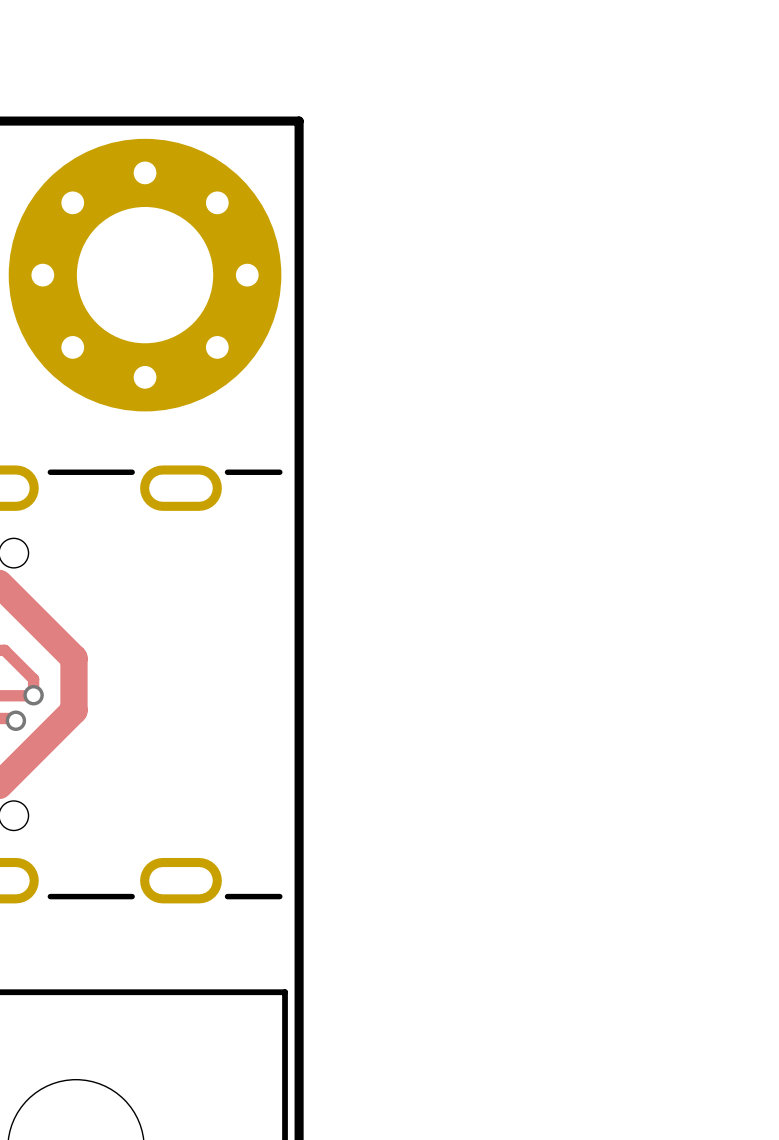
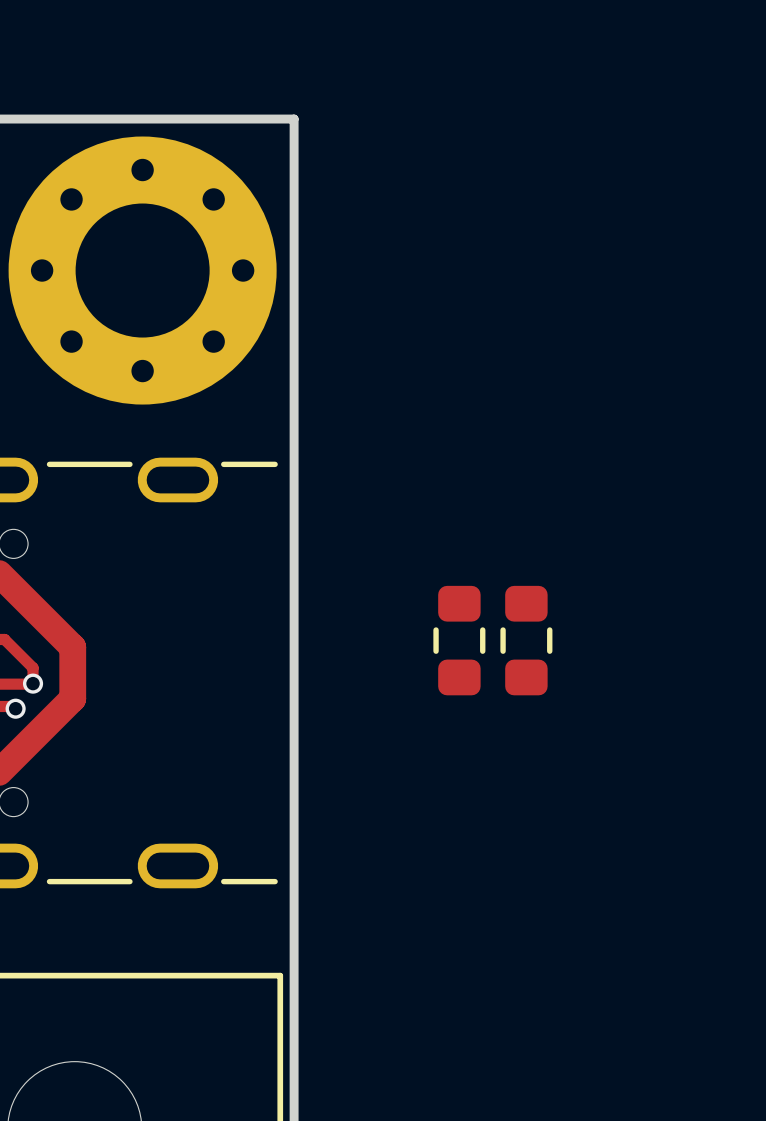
part: none -> (459, 640)
part: none -> (526, 640)

